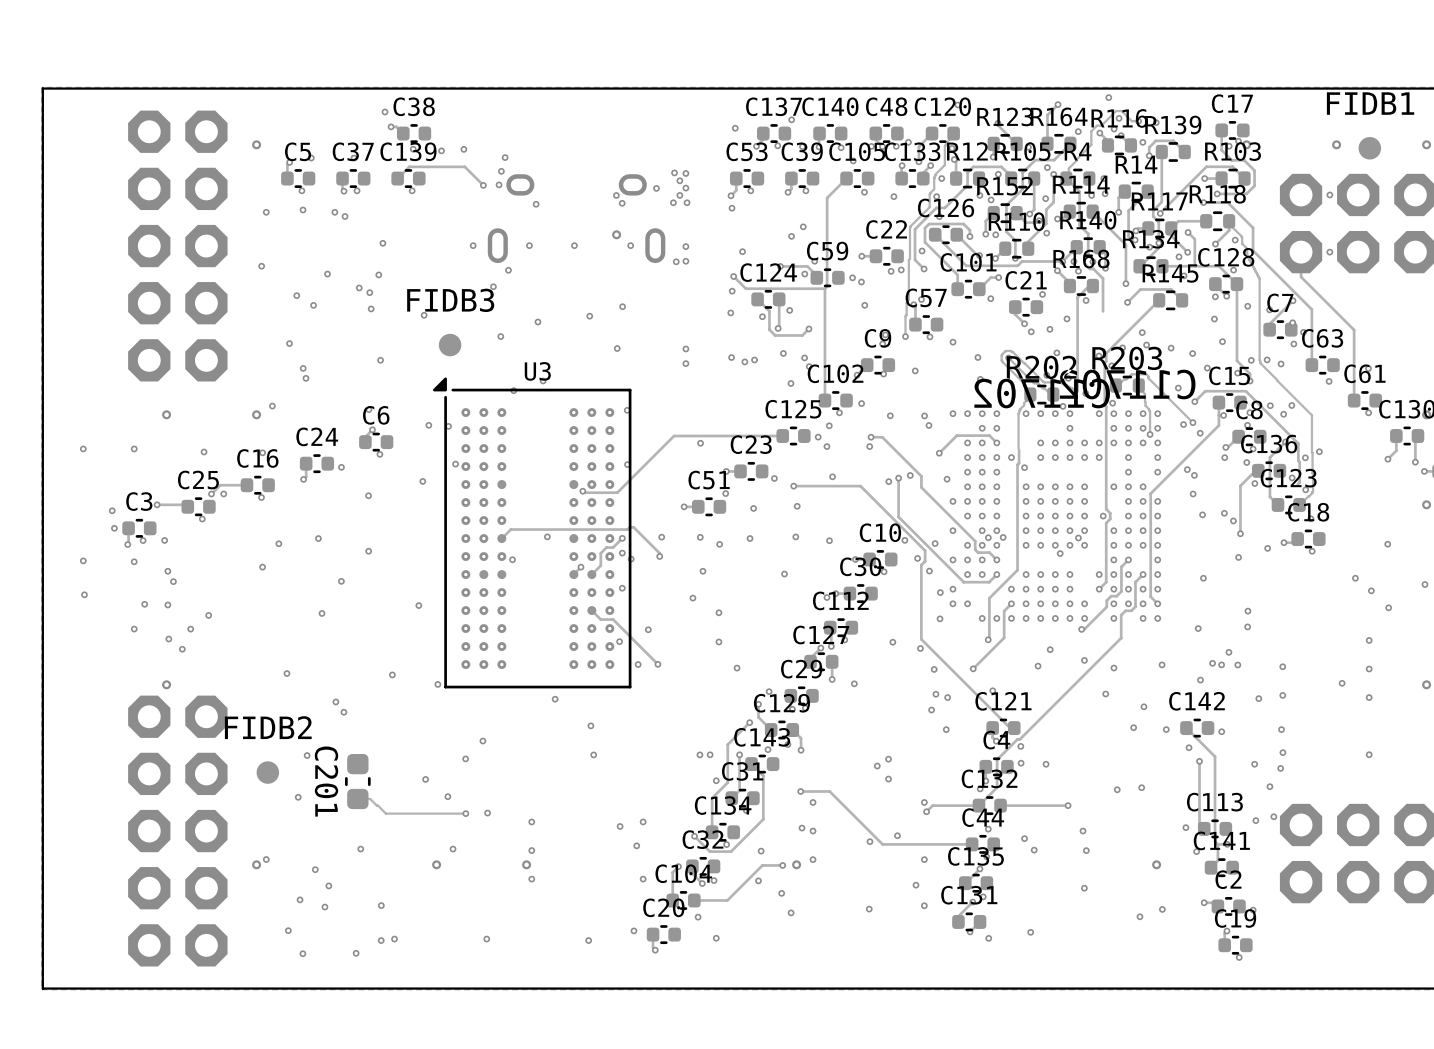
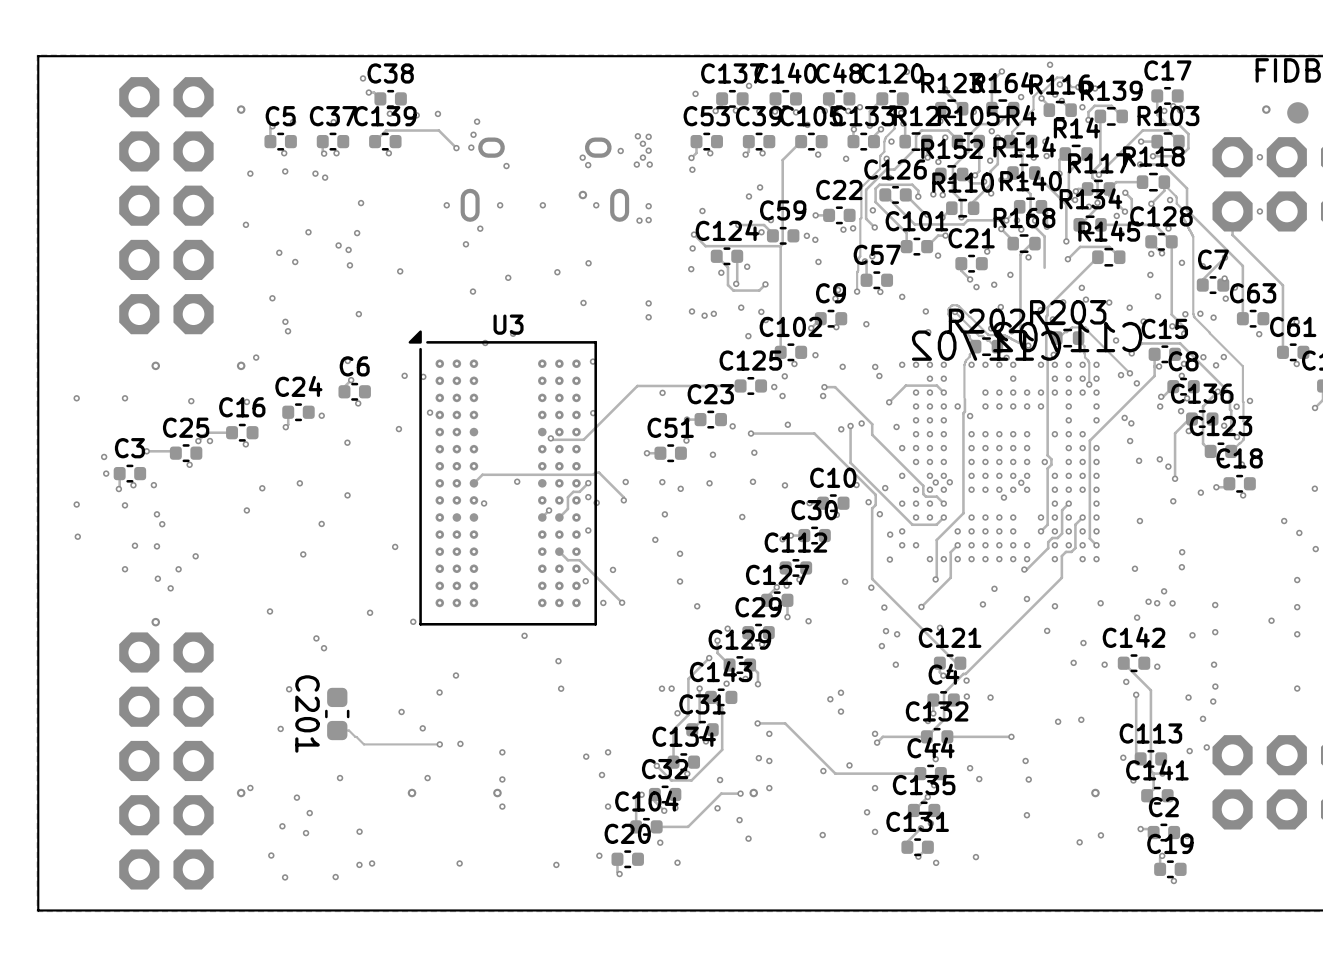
FIDB3: (450, 345) -> none
FIDB2: (267, 772) -> none

